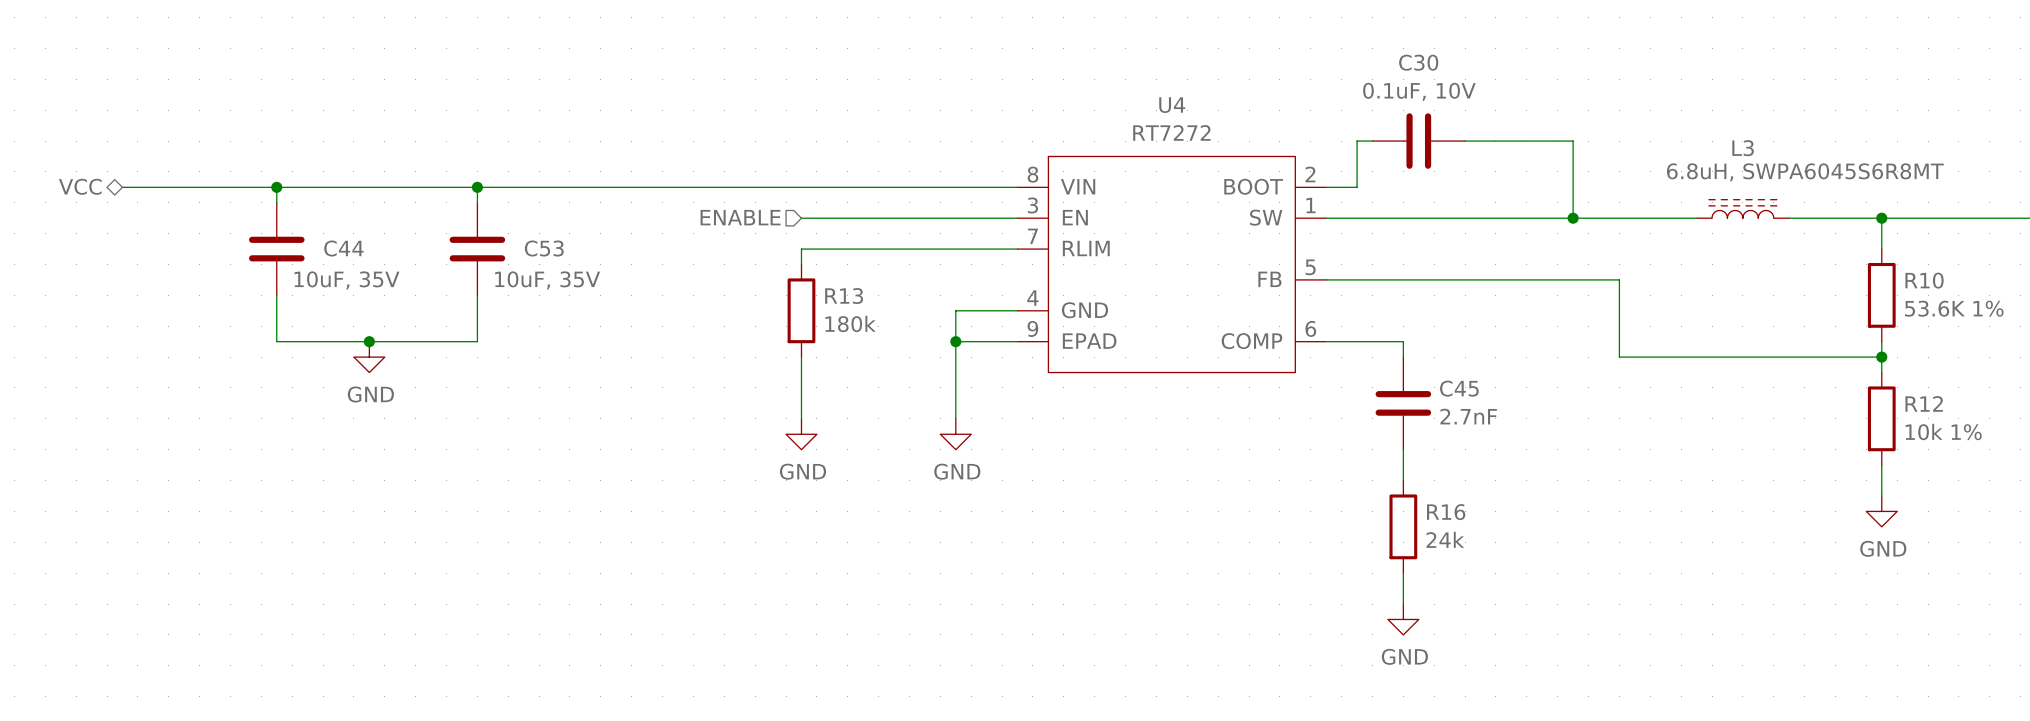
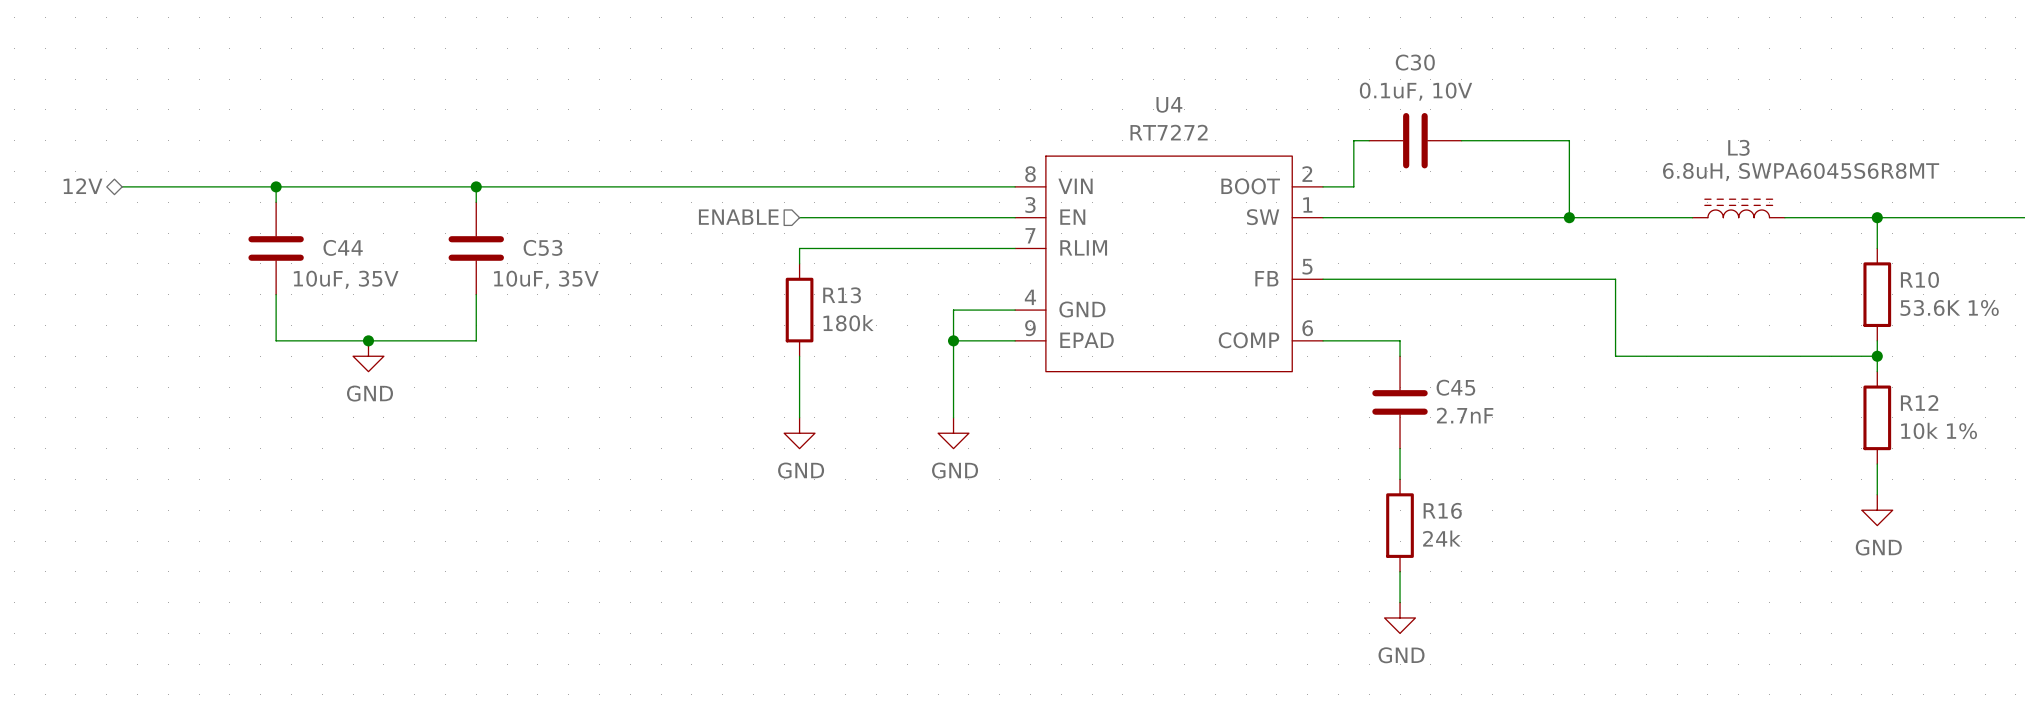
hierarchical label: VCC (80, 186) -> 12V (83, 186)

